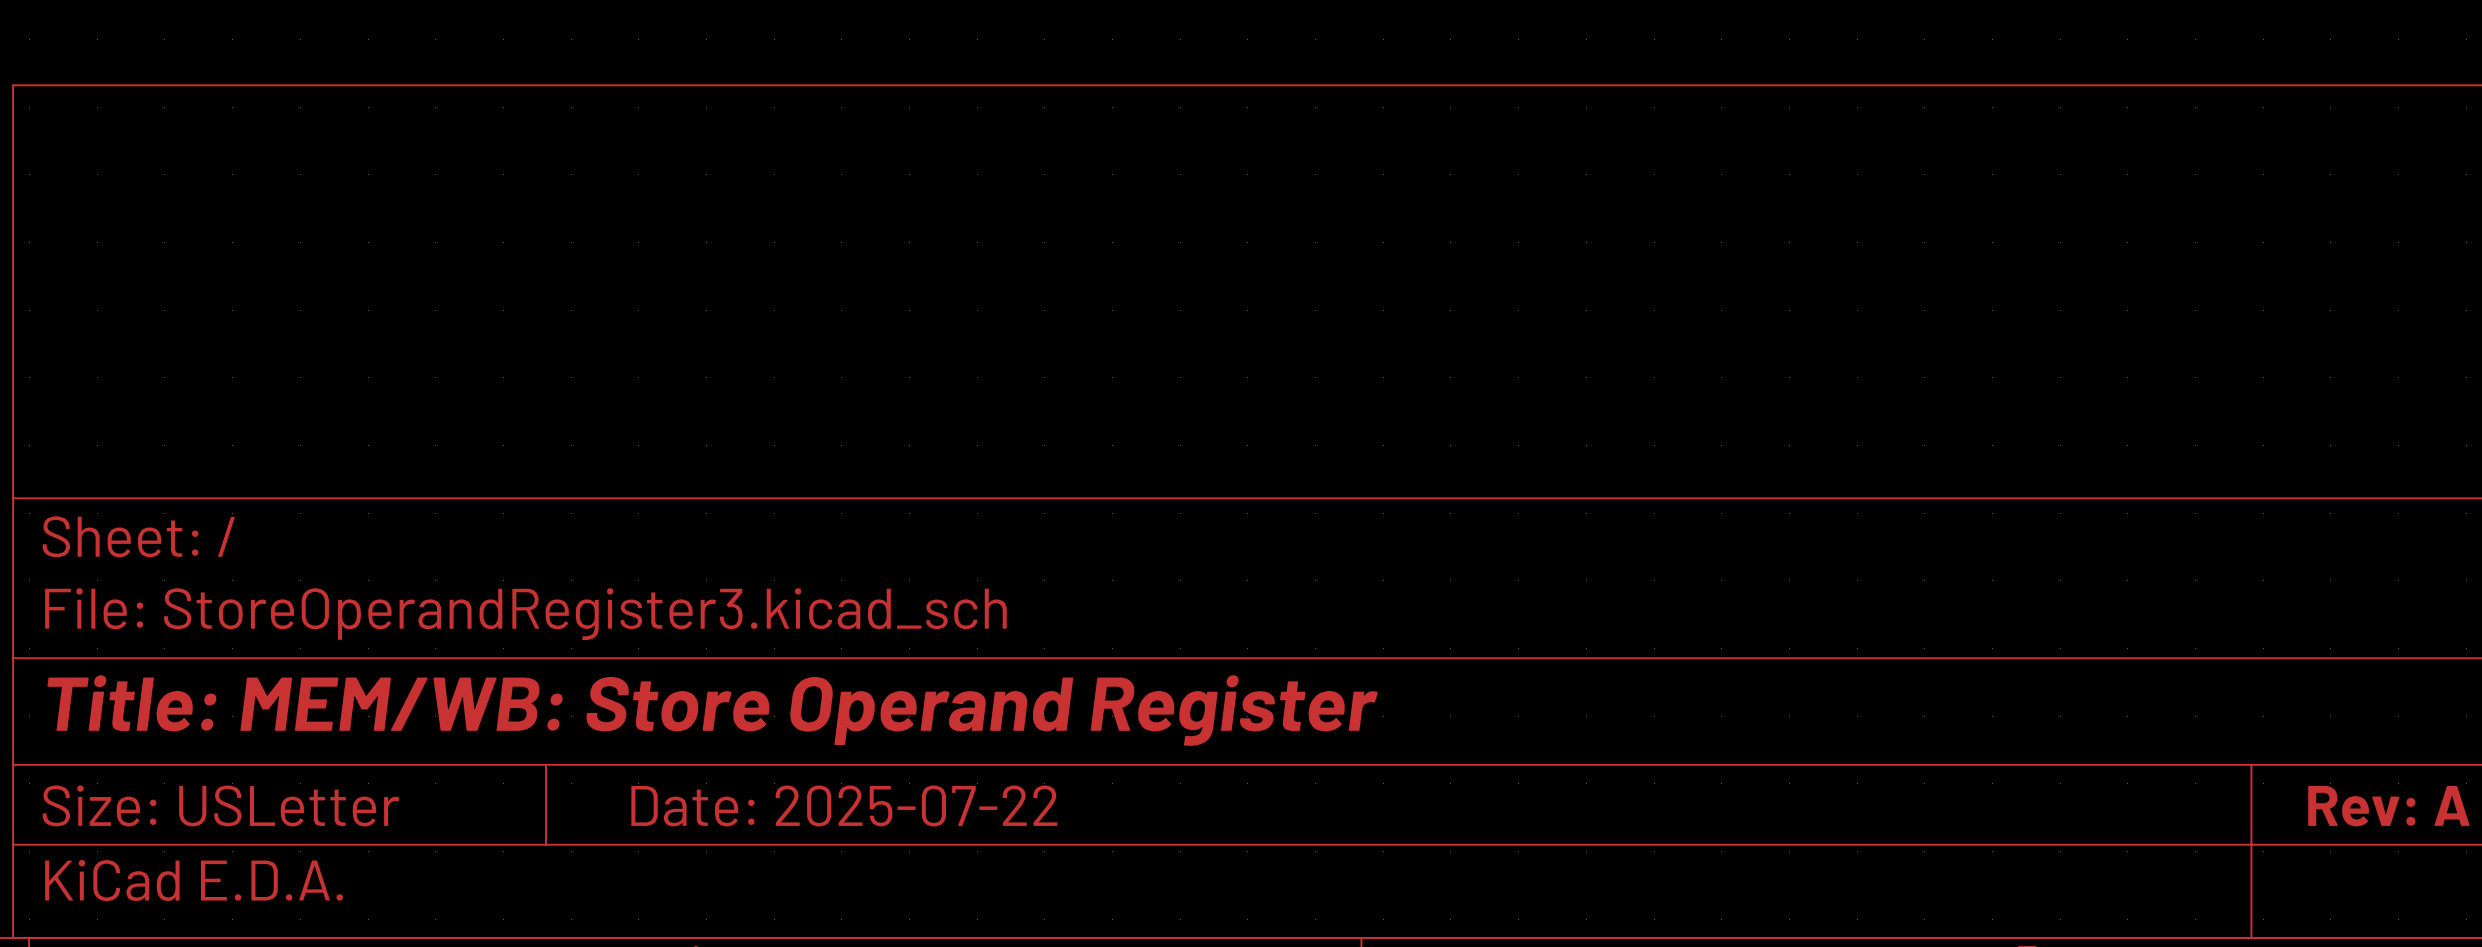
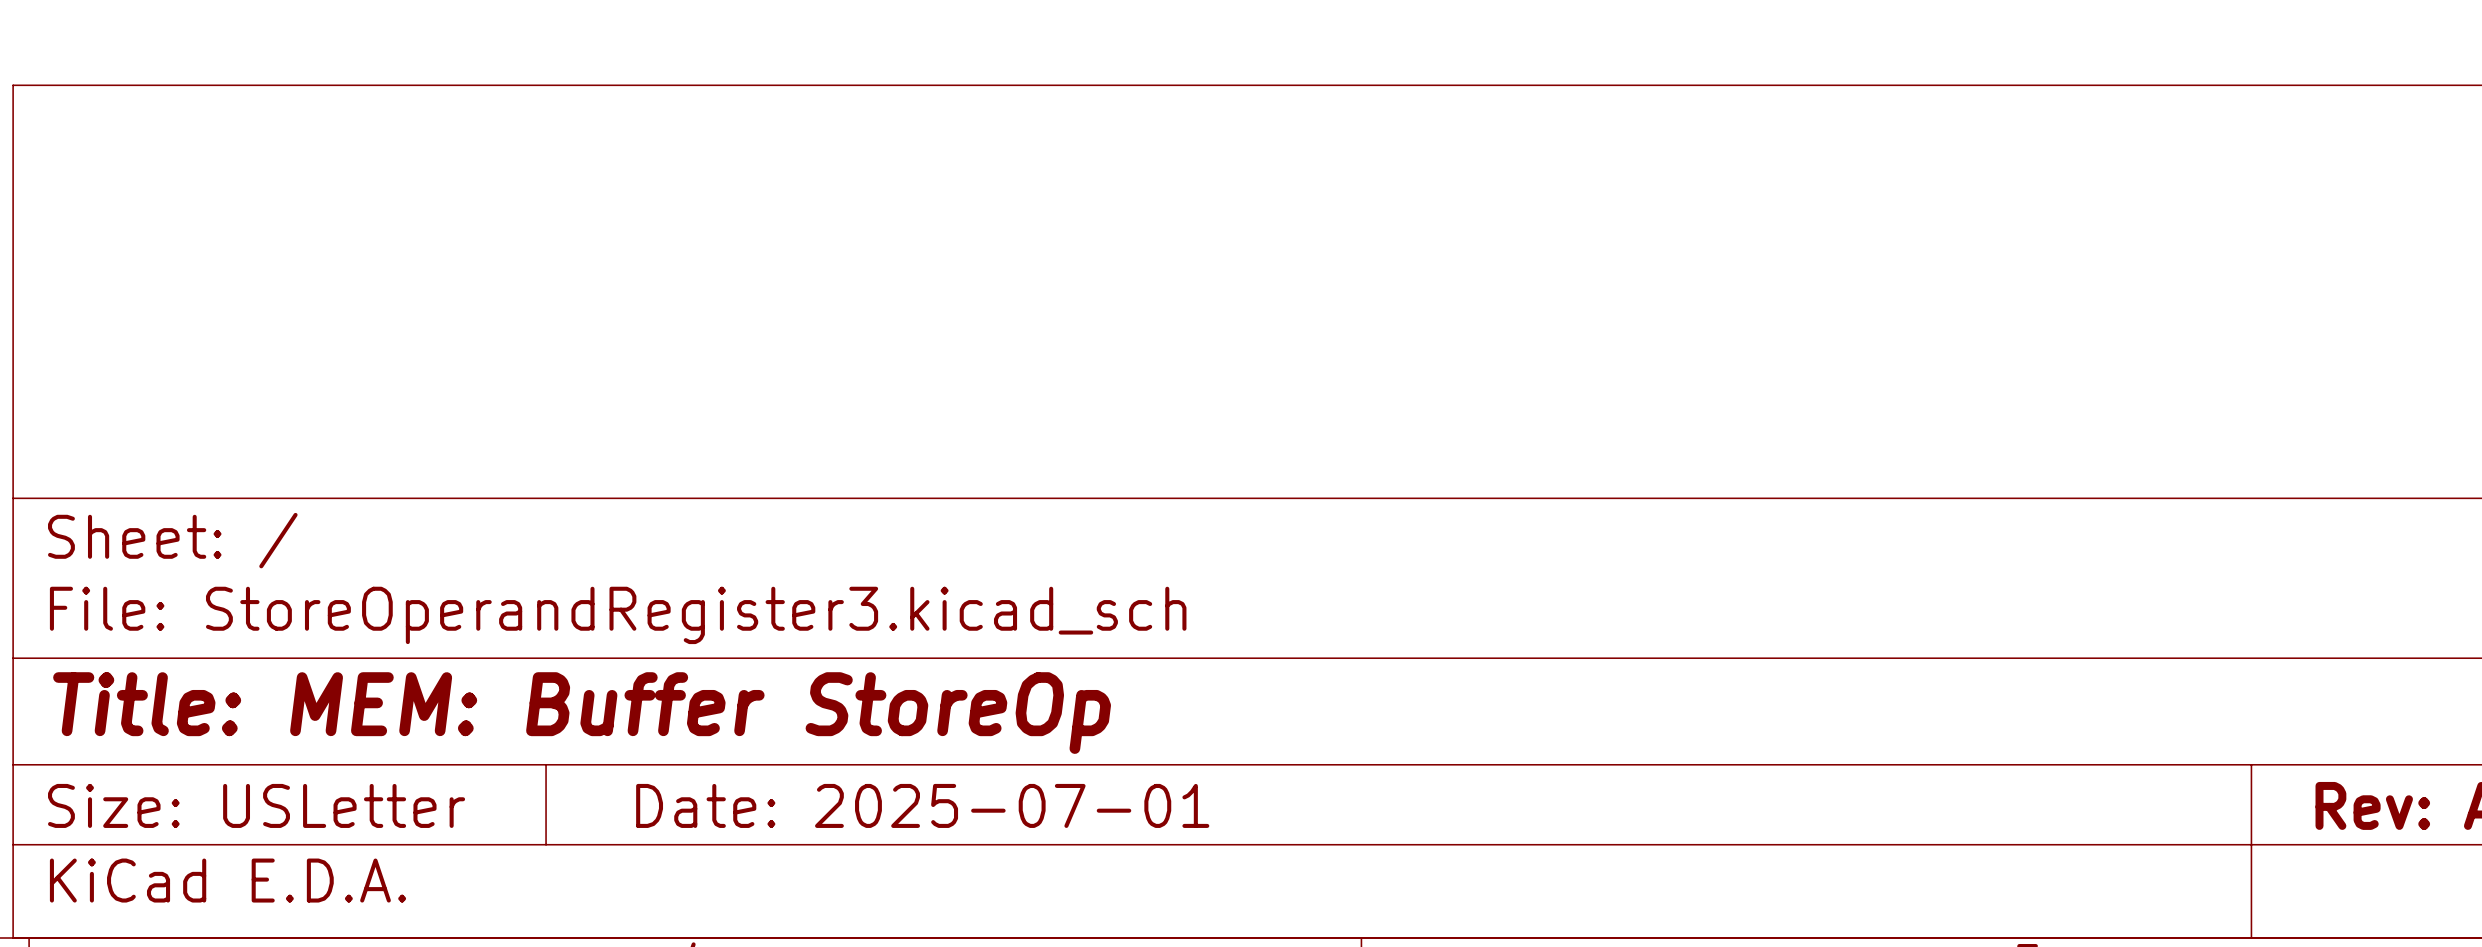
title block: Title: MEM/WB: Store Operand Register (712, 710) -> Title: MEM: Buffer StoreOp (582, 713)
title block: Date: 2025-07-22 (844, 805) -> Date: 2025-07-01 (922, 805)

